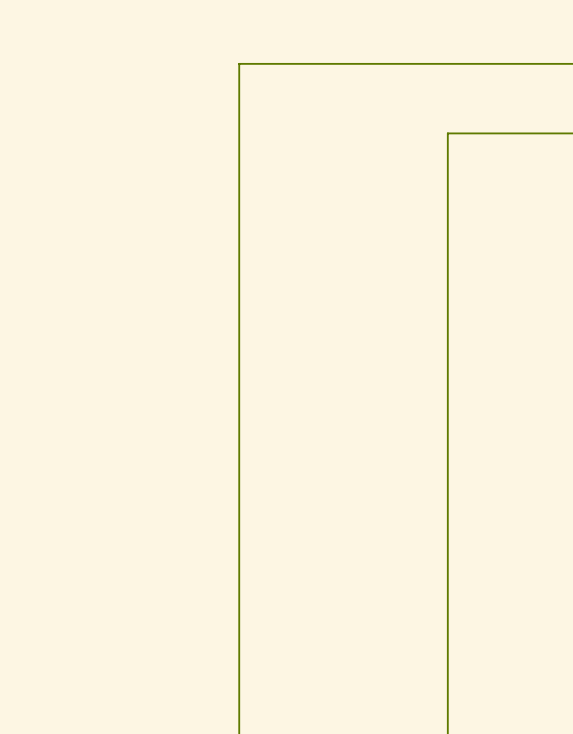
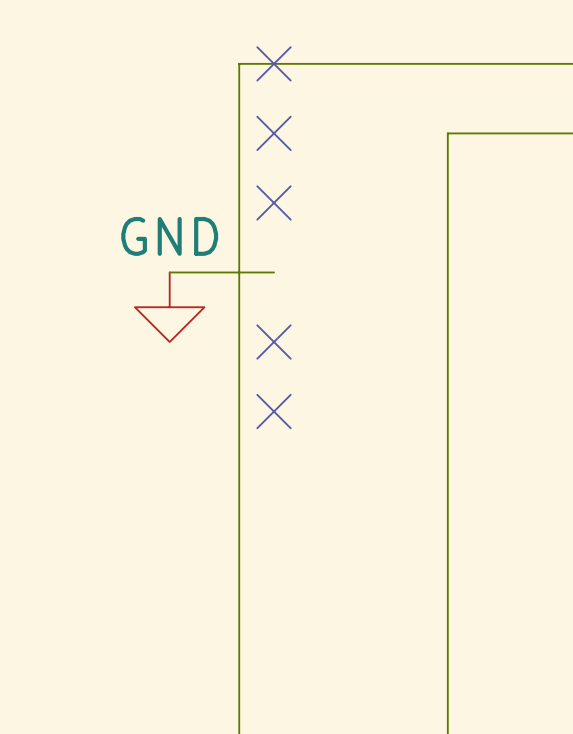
no-connect mark: none -> (273, 63)
no-connect mark: none -> (273, 133)
no-connect mark: none -> (273, 202)
wire: none -> (169, 272) (273, 272)
power symbol: none -> GND (169, 307)
no-connect mark: none -> (273, 342)
no-connect mark: none -> (273, 411)

